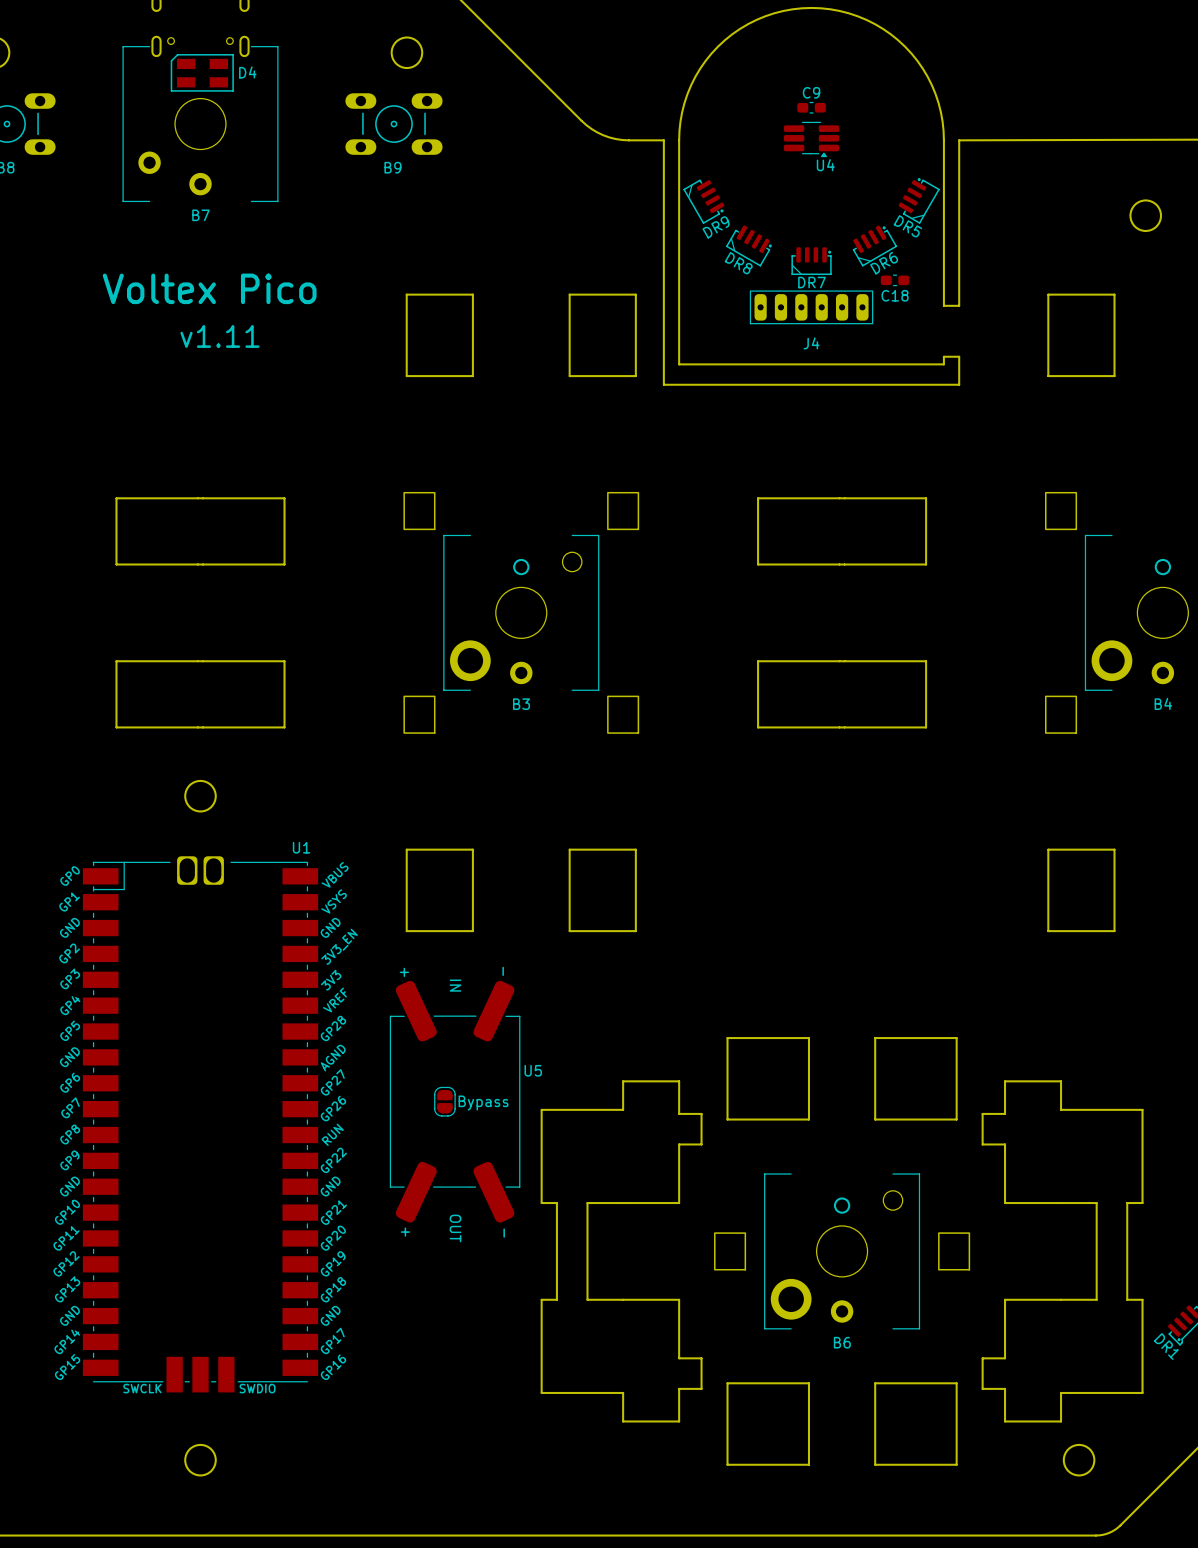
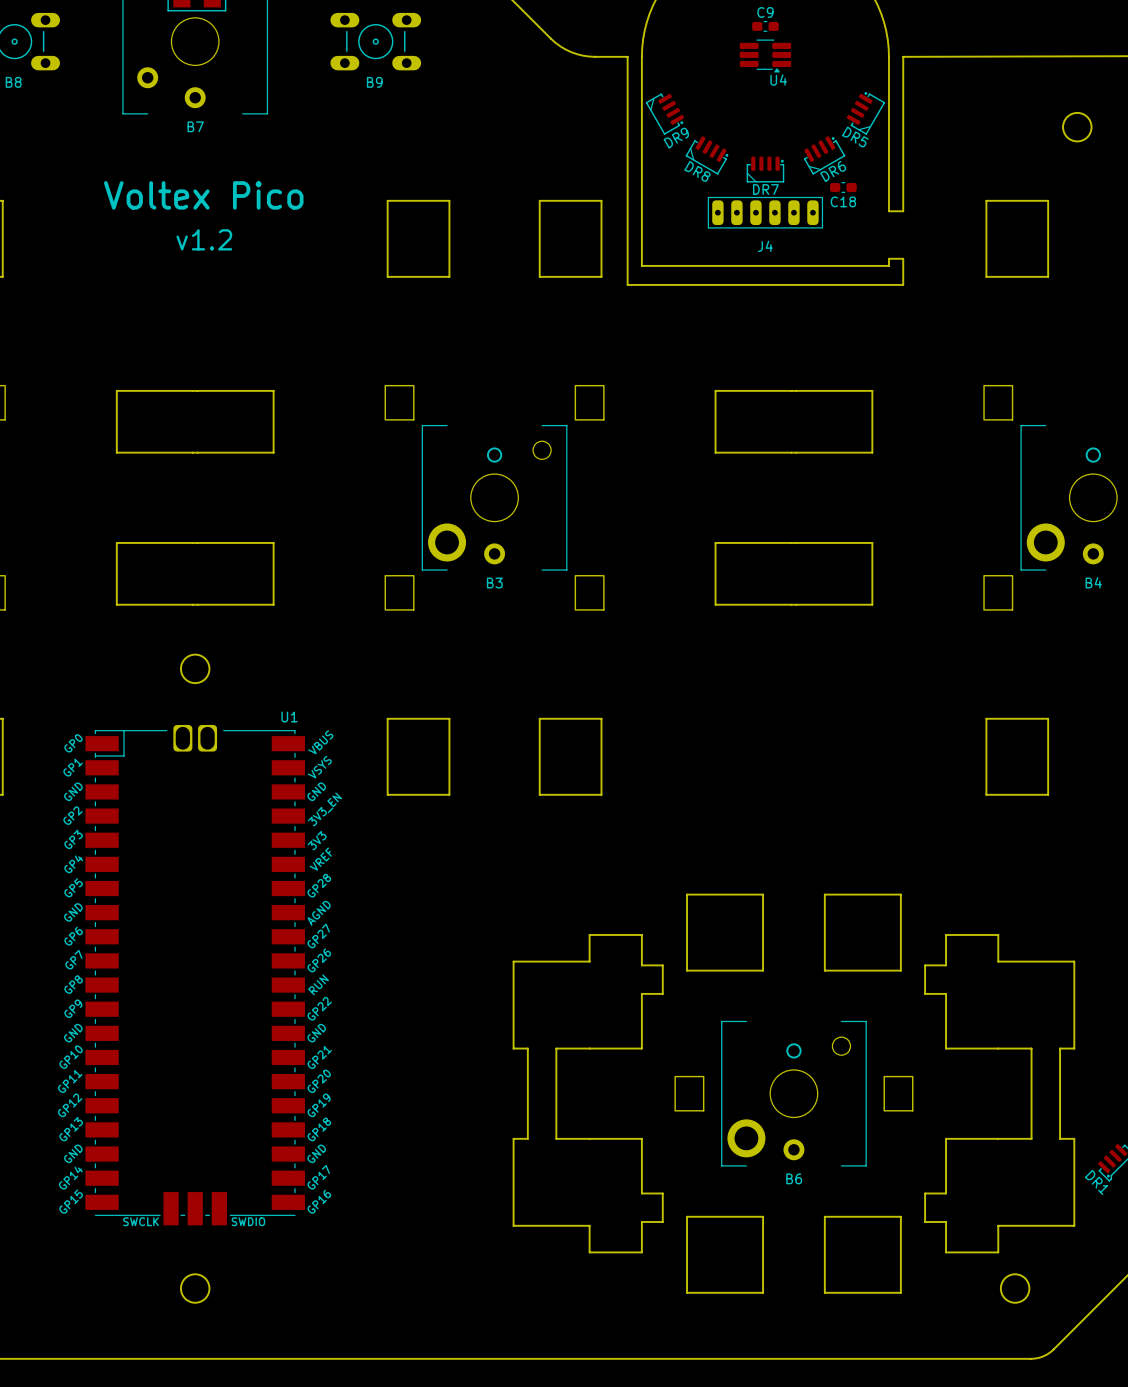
text: v1.11 (219, 336) -> v1.2 (204, 239)
part: Bypass (444, 1101) -> none
U5: (455, 1101) -> none

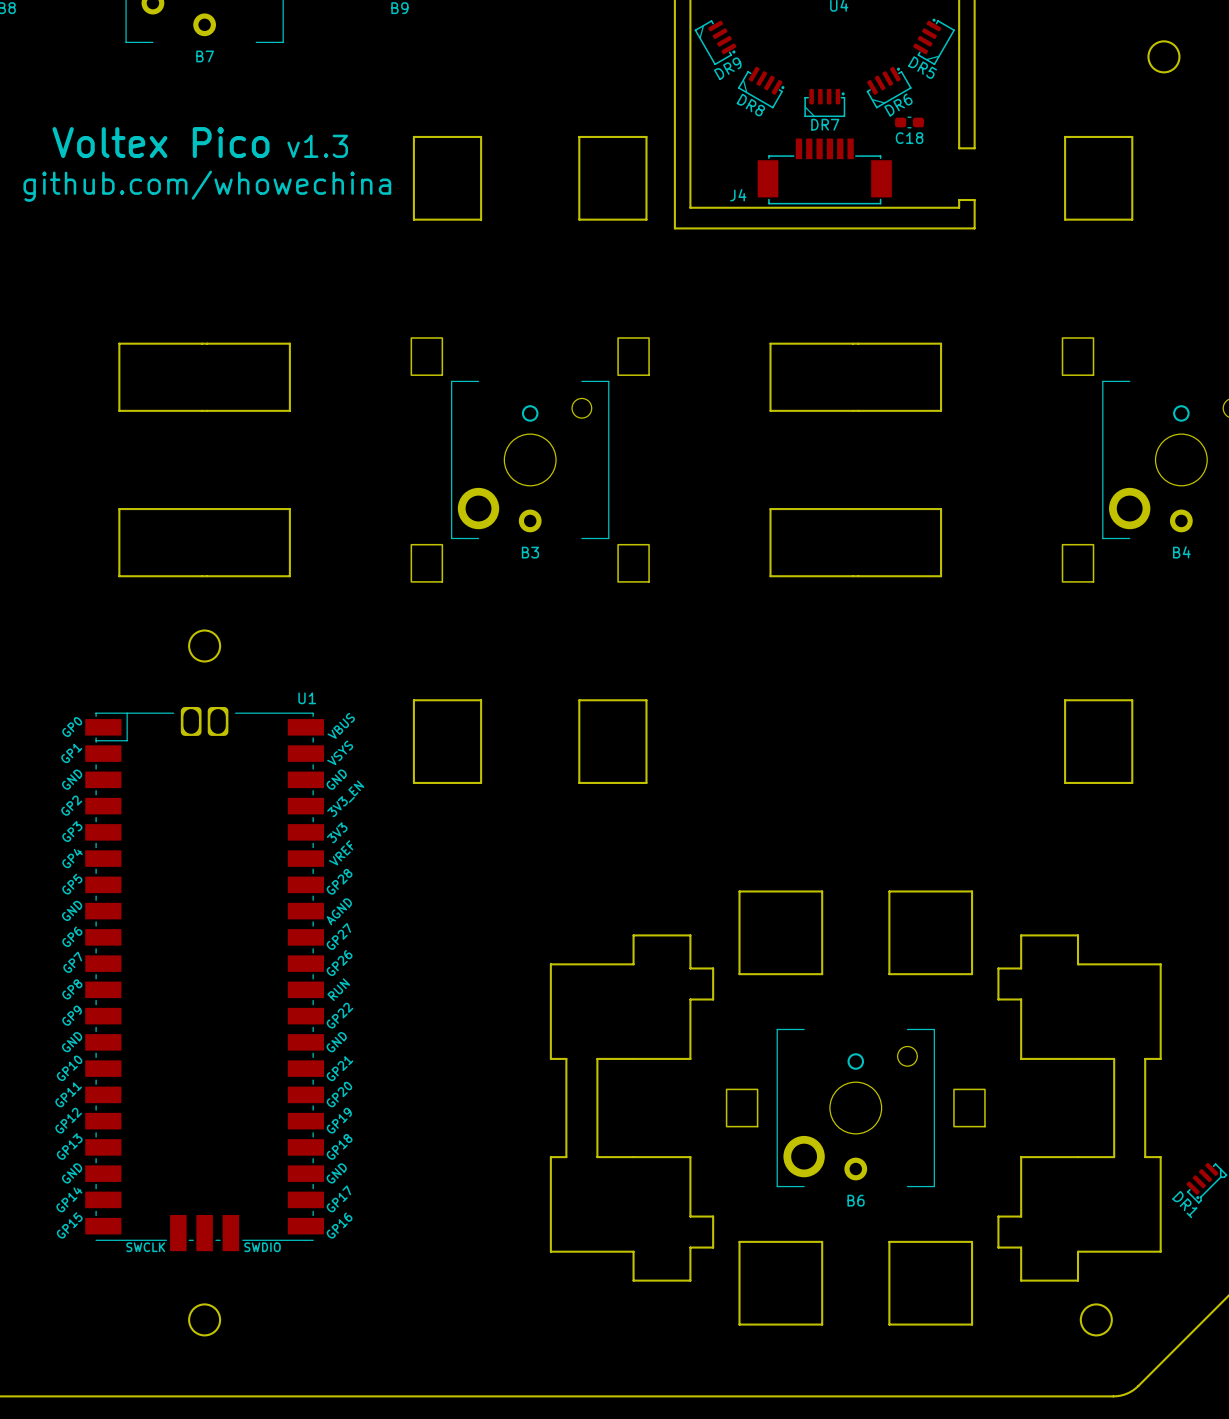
text position: Voltex Pico (203, 195) -> Voltex Pico (160, 142)
J4 footprint: [707, 196, 824, 229] -> [757, 138, 892, 205]
text: none -> v1.3 (317, 146)
text: v1.2 (204, 239) -> none
text: none -> github.com/whowechina (207, 186)
J4 name position: J4 (765, 246) -> J4 (738, 195)

